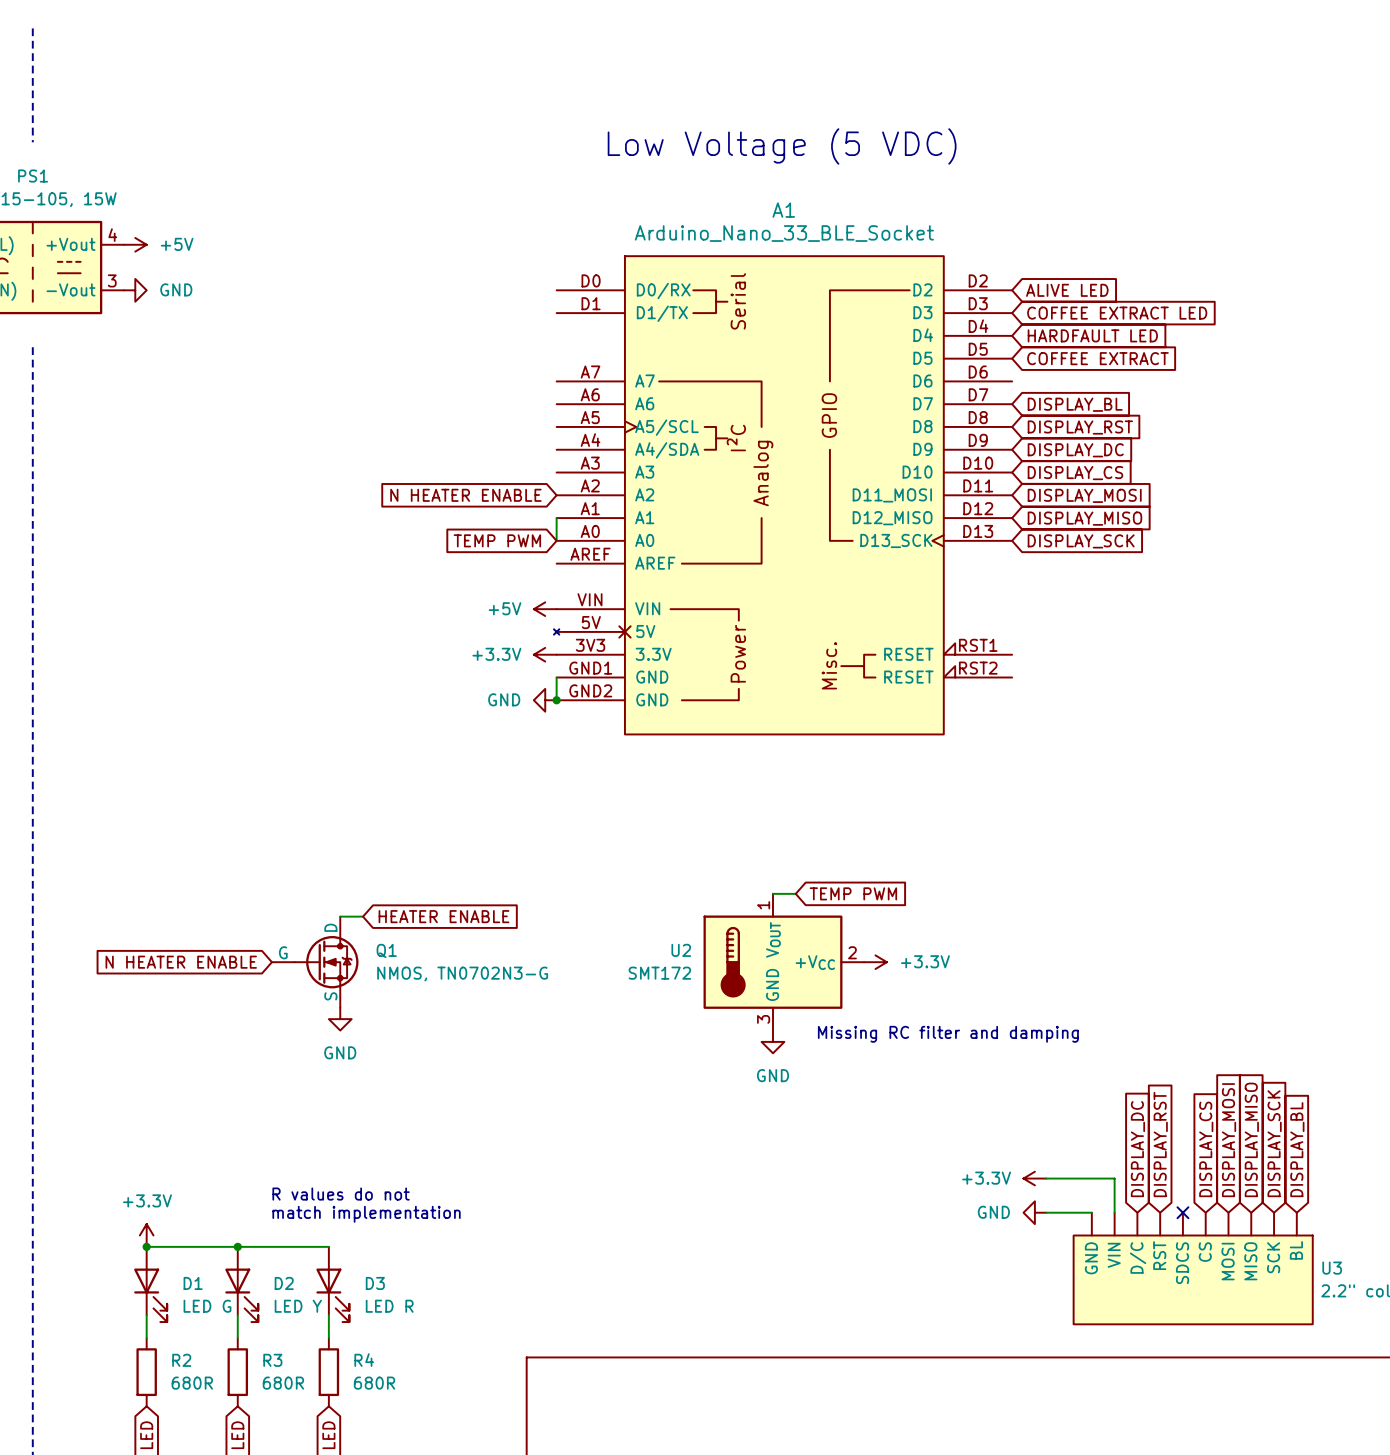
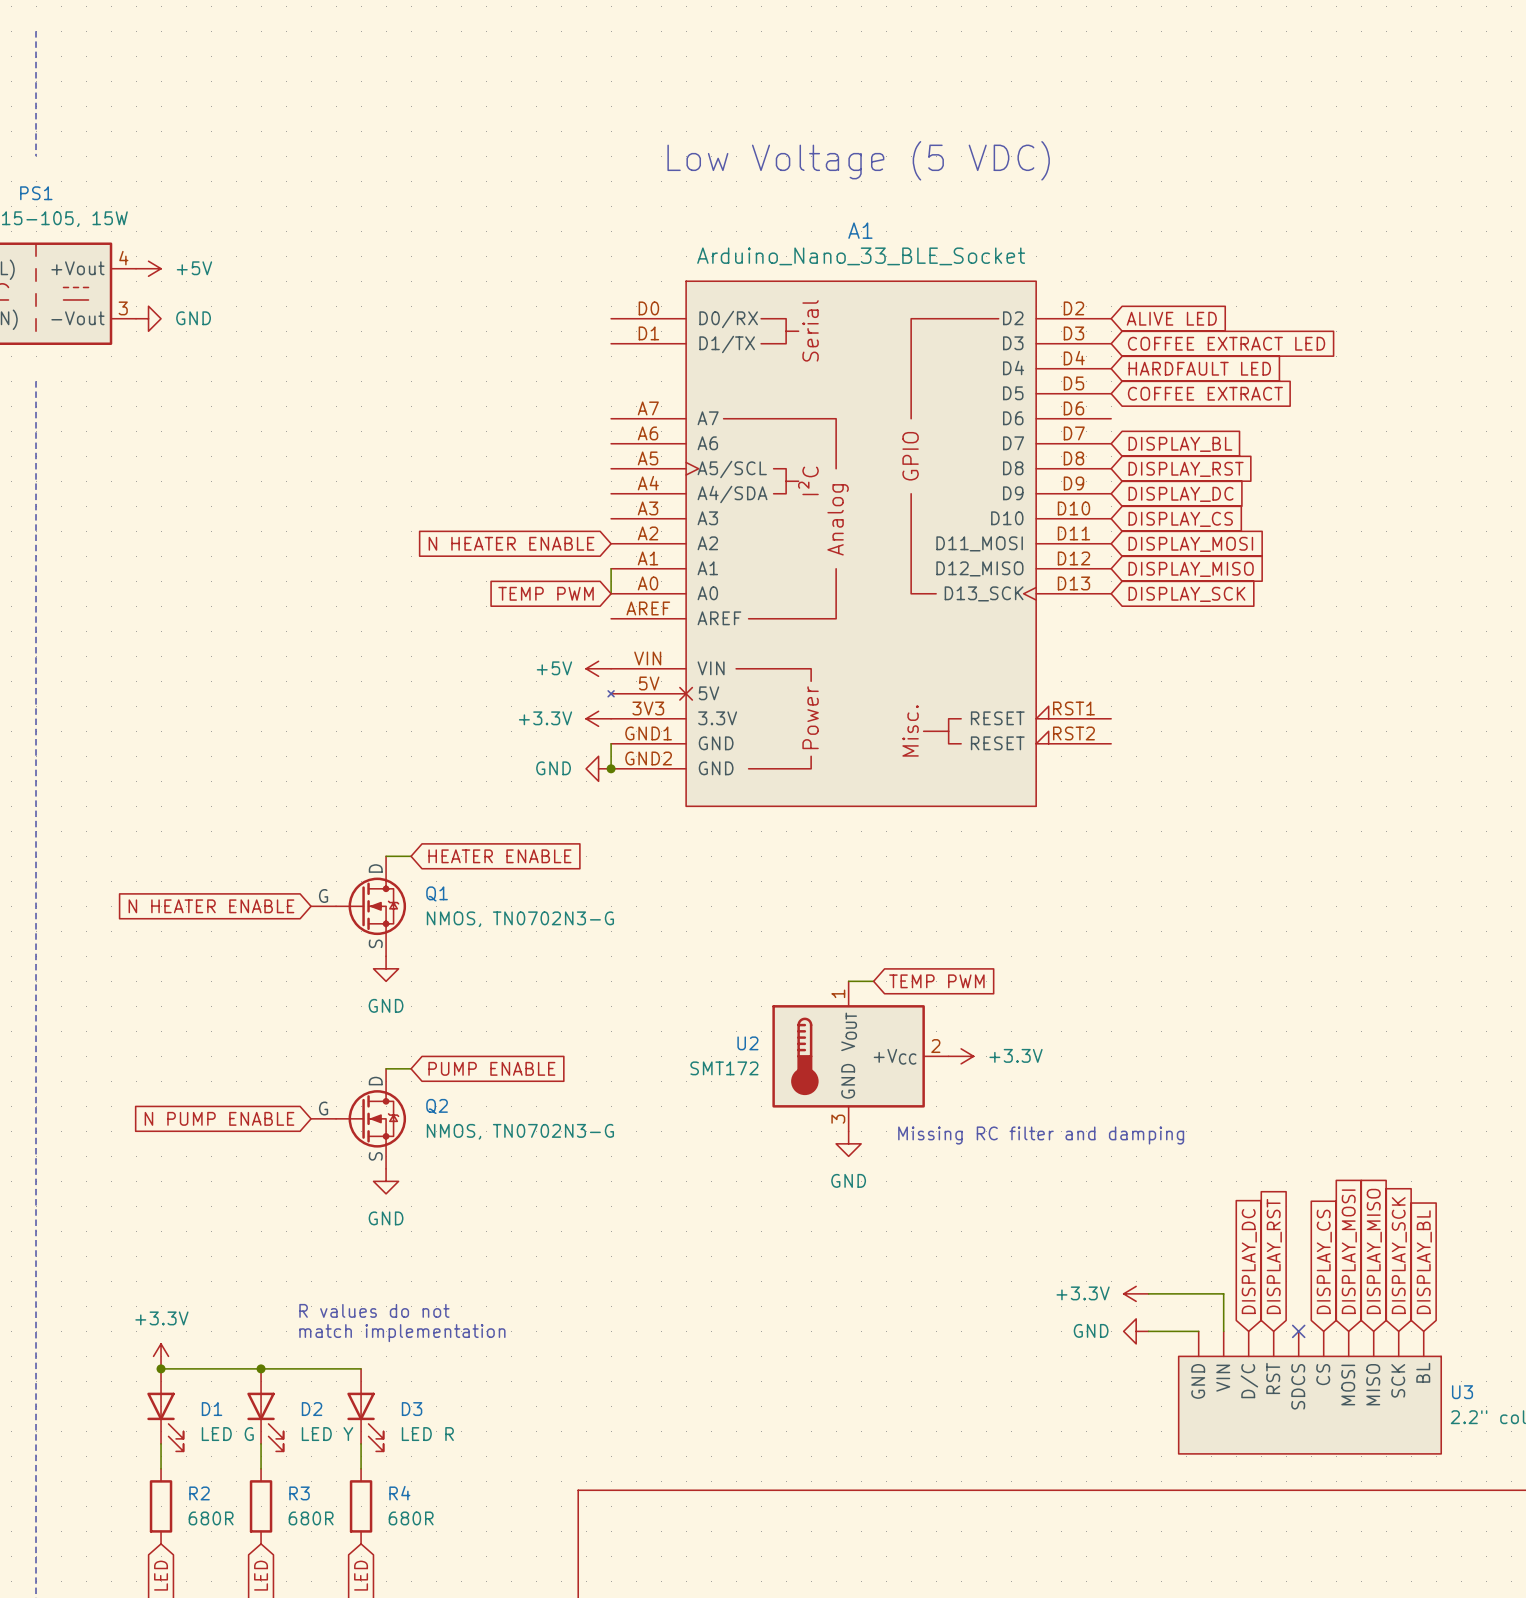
wire: none -> (386, 856) (411, 856)
power symbol: none -> GND (386, 968)
wire: (340, 916) (363, 916) -> (386, 1068) (411, 1068)
global label position: HEATER ENABLE (443, 916) -> HEATER ENABLE (499, 856)
global label position: N HEATER ENABLE (181, 962) -> N HEATER ENABLE (211, 906)
Q1 position: (315, 962) -> (358, 906)
global label: none -> PUMP ENABLE (491, 1068)
global label: none -> N PUMP ENABLE (219, 1118)
Q2: none -> NMOS, TN0702N3-G (358, 1118)
power symbol position: GND (340, 1019) -> GND (386, 1181)

